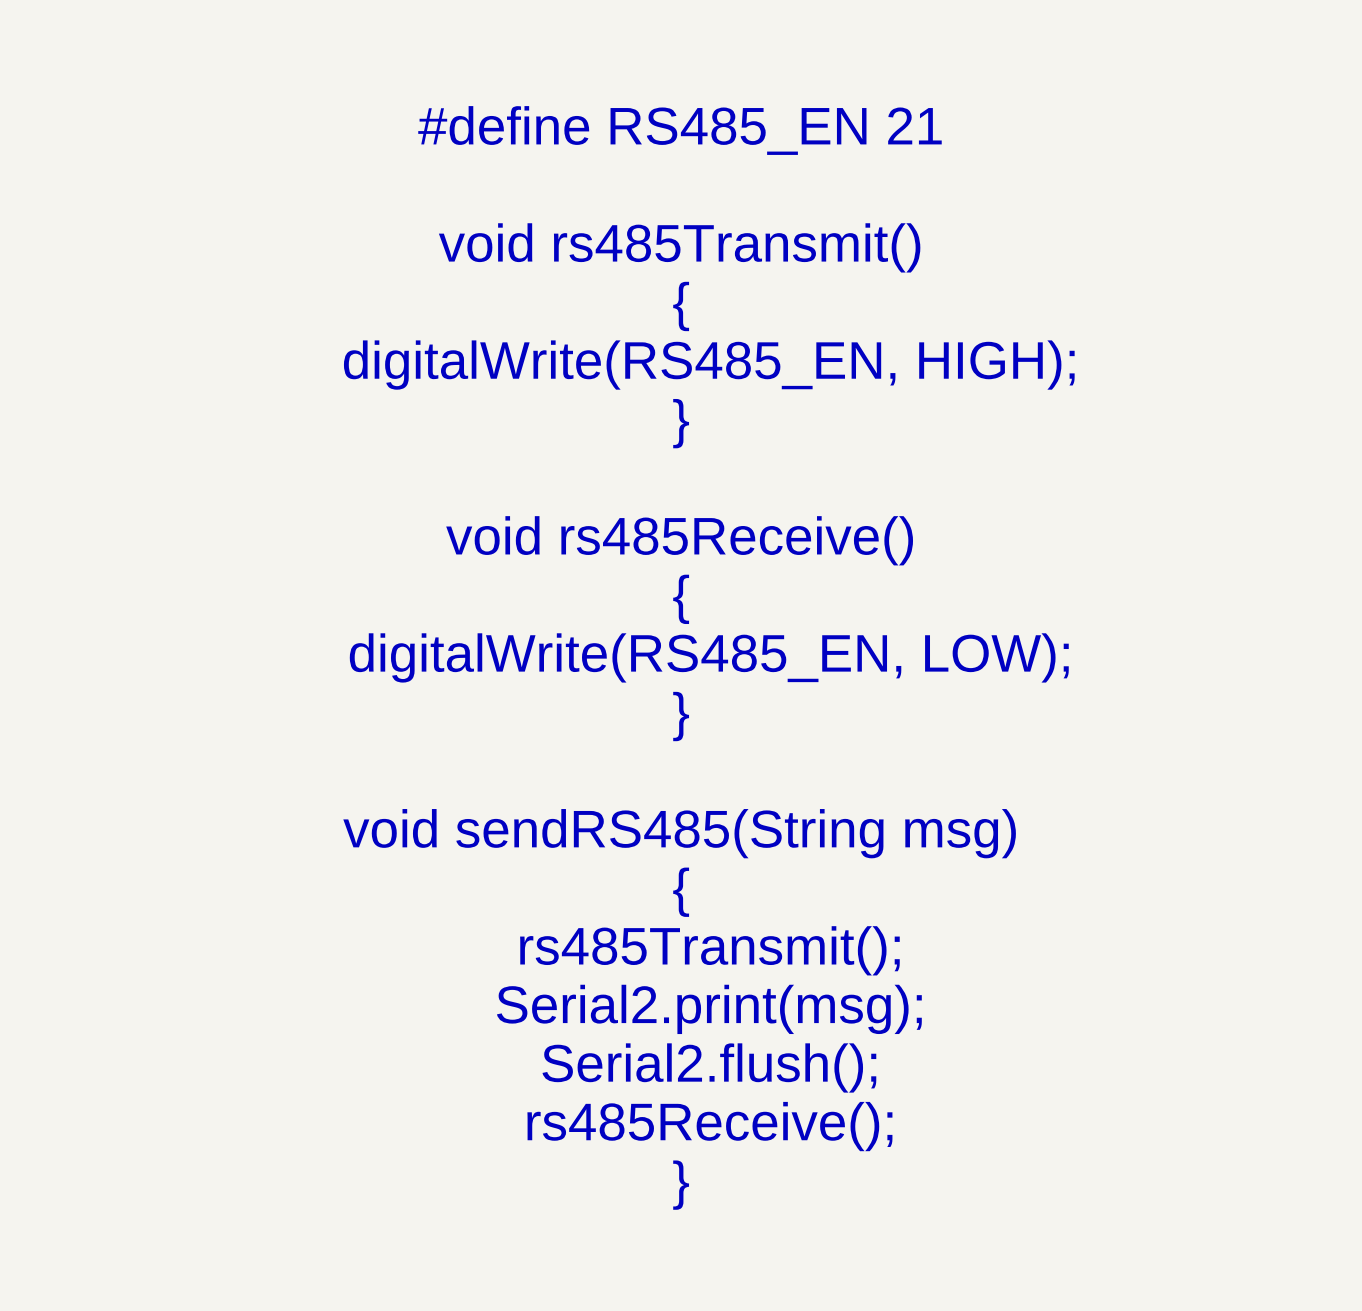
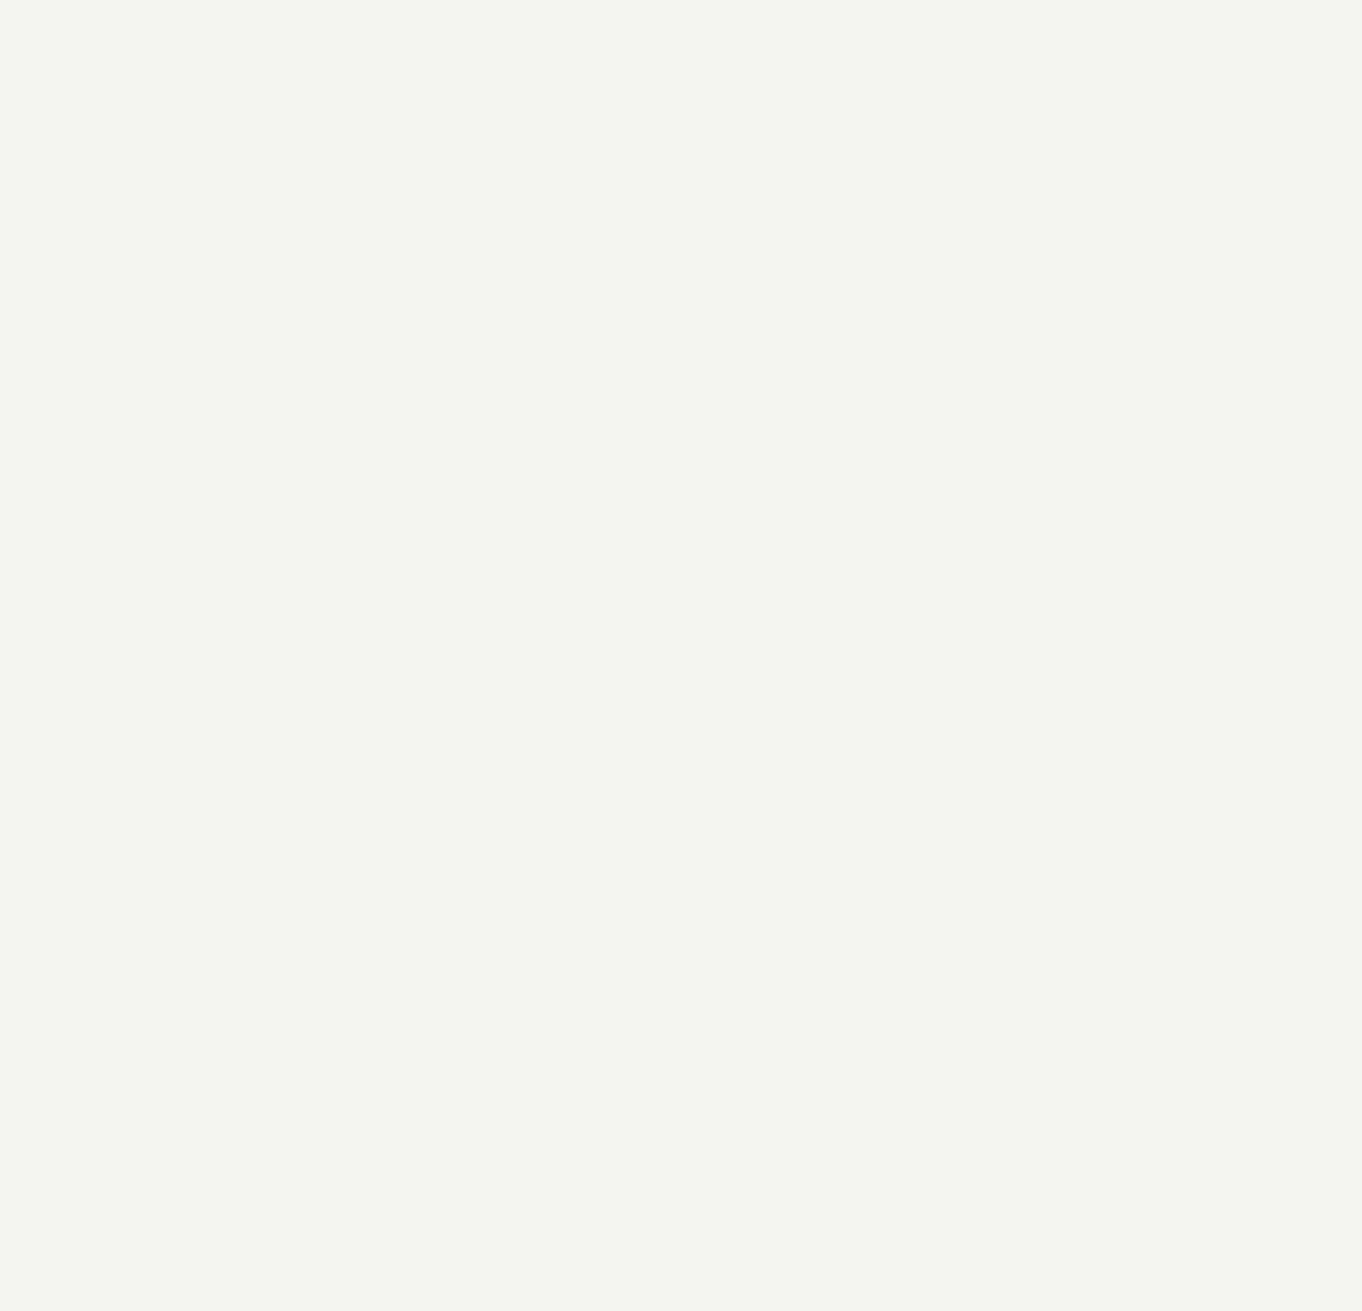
text: #define RS485_EN 21 (679, 130) -> none
text: void rs485Transmit() (679, 247) -> none
text: { (681, 306) -> none
text: digitalWrite(RS485_EN, HIGH); (709, 365) -> none
text: } (681, 423) -> none
text: void rs485Receive() (679, 540) -> none
text: { (681, 599) -> none
text: digitalWrite(RS485_EN, LOW); (709, 657) -> none
text: } (681, 716) -> none
text: void sendRS485(String msg) (679, 833) -> none
text: { (681, 892) -> none
text: rs485Transmit(); (709, 950) -> none
text: Serial2.print(msg); (709, 1009) -> none
text: Serial2.flush(); (709, 1067) -> none
text: rs485Receive(); (709, 1126) -> none
text: } (681, 1185) -> none

